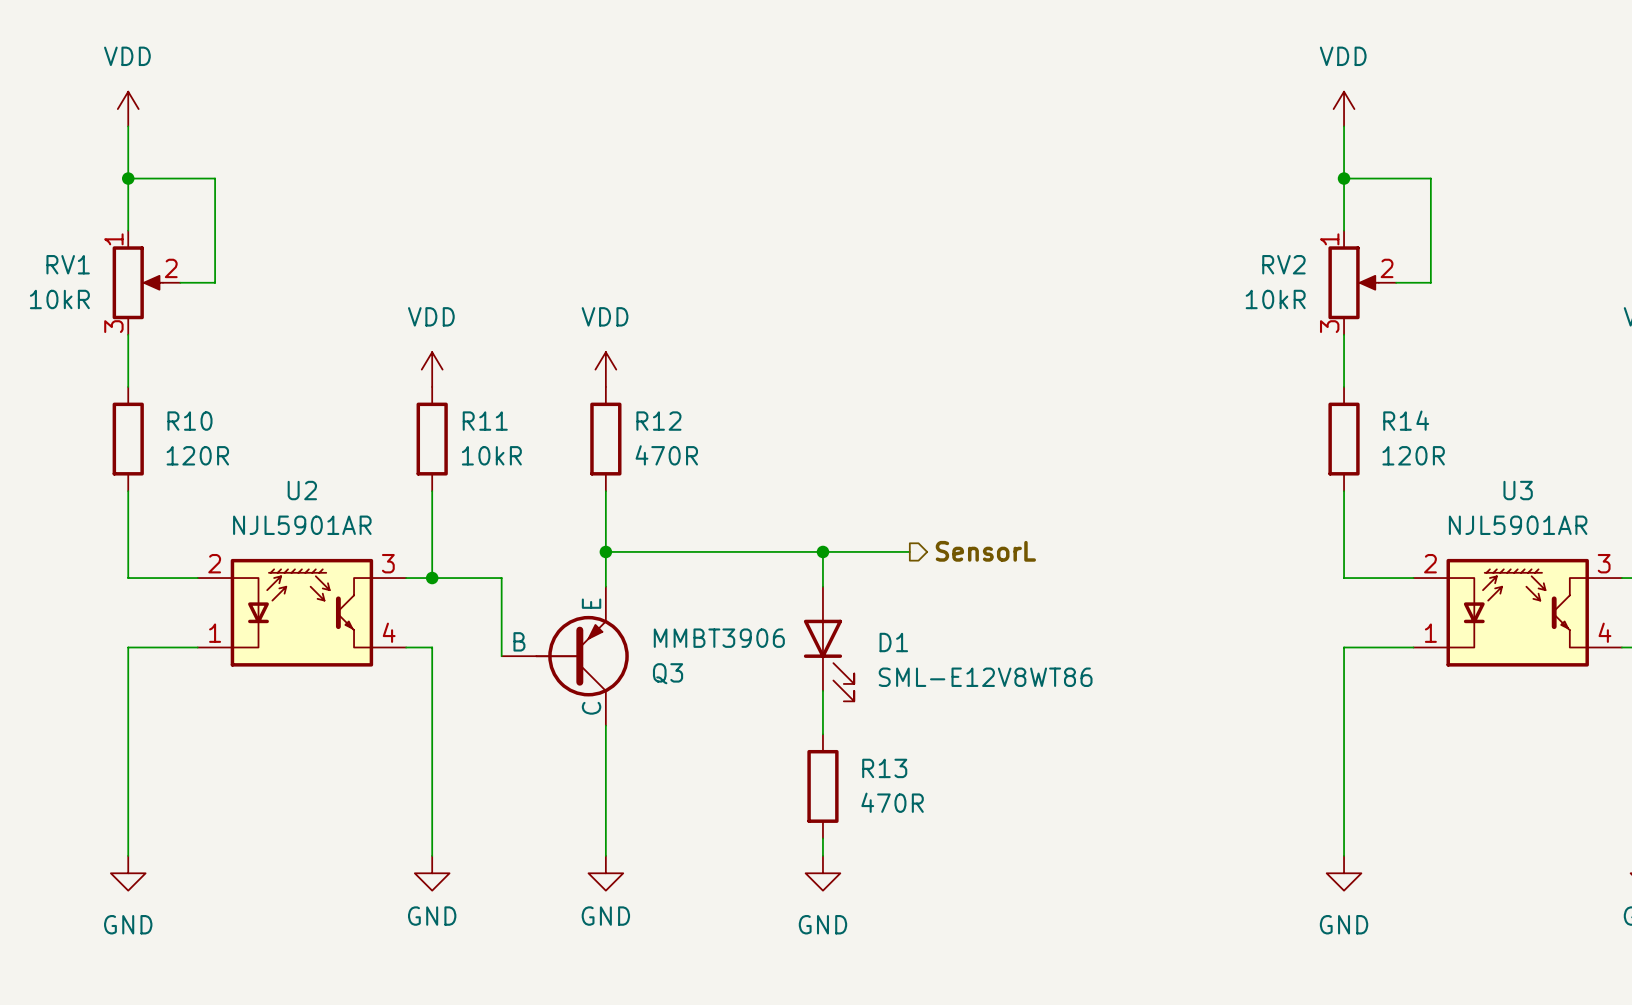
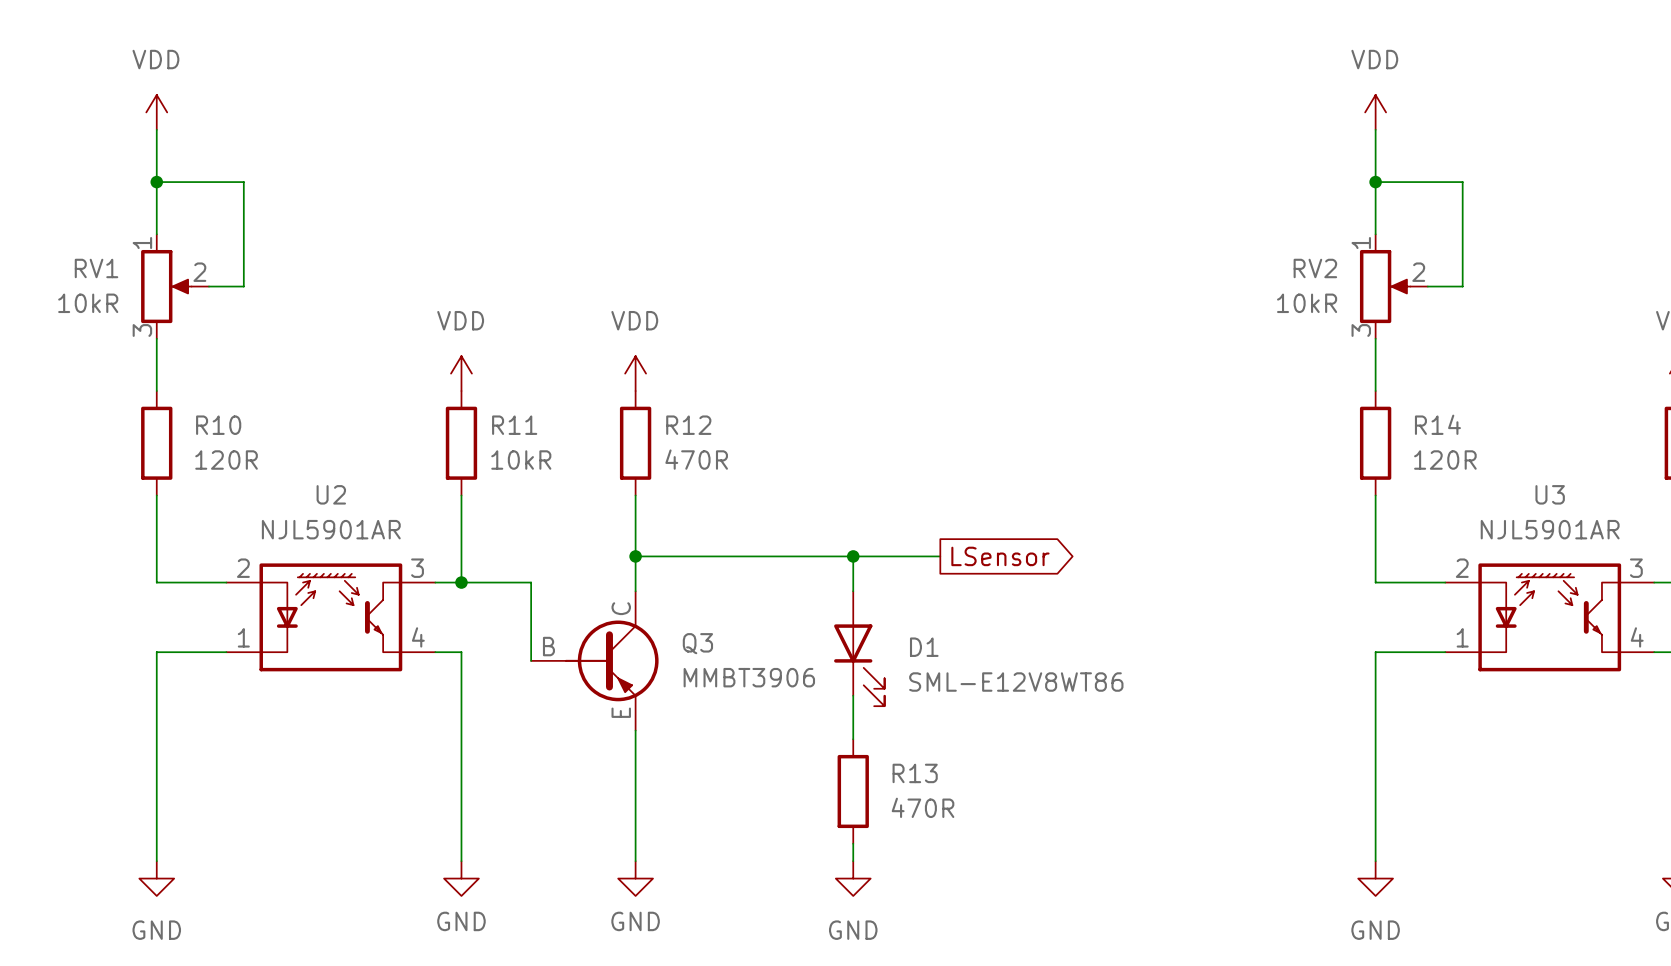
global label: none -> LSensor (1000, 556)
hierarchical label: SensorL (985, 551) -> none
Q3 flip: as is (582, 656) -> up-down (611, 660)

